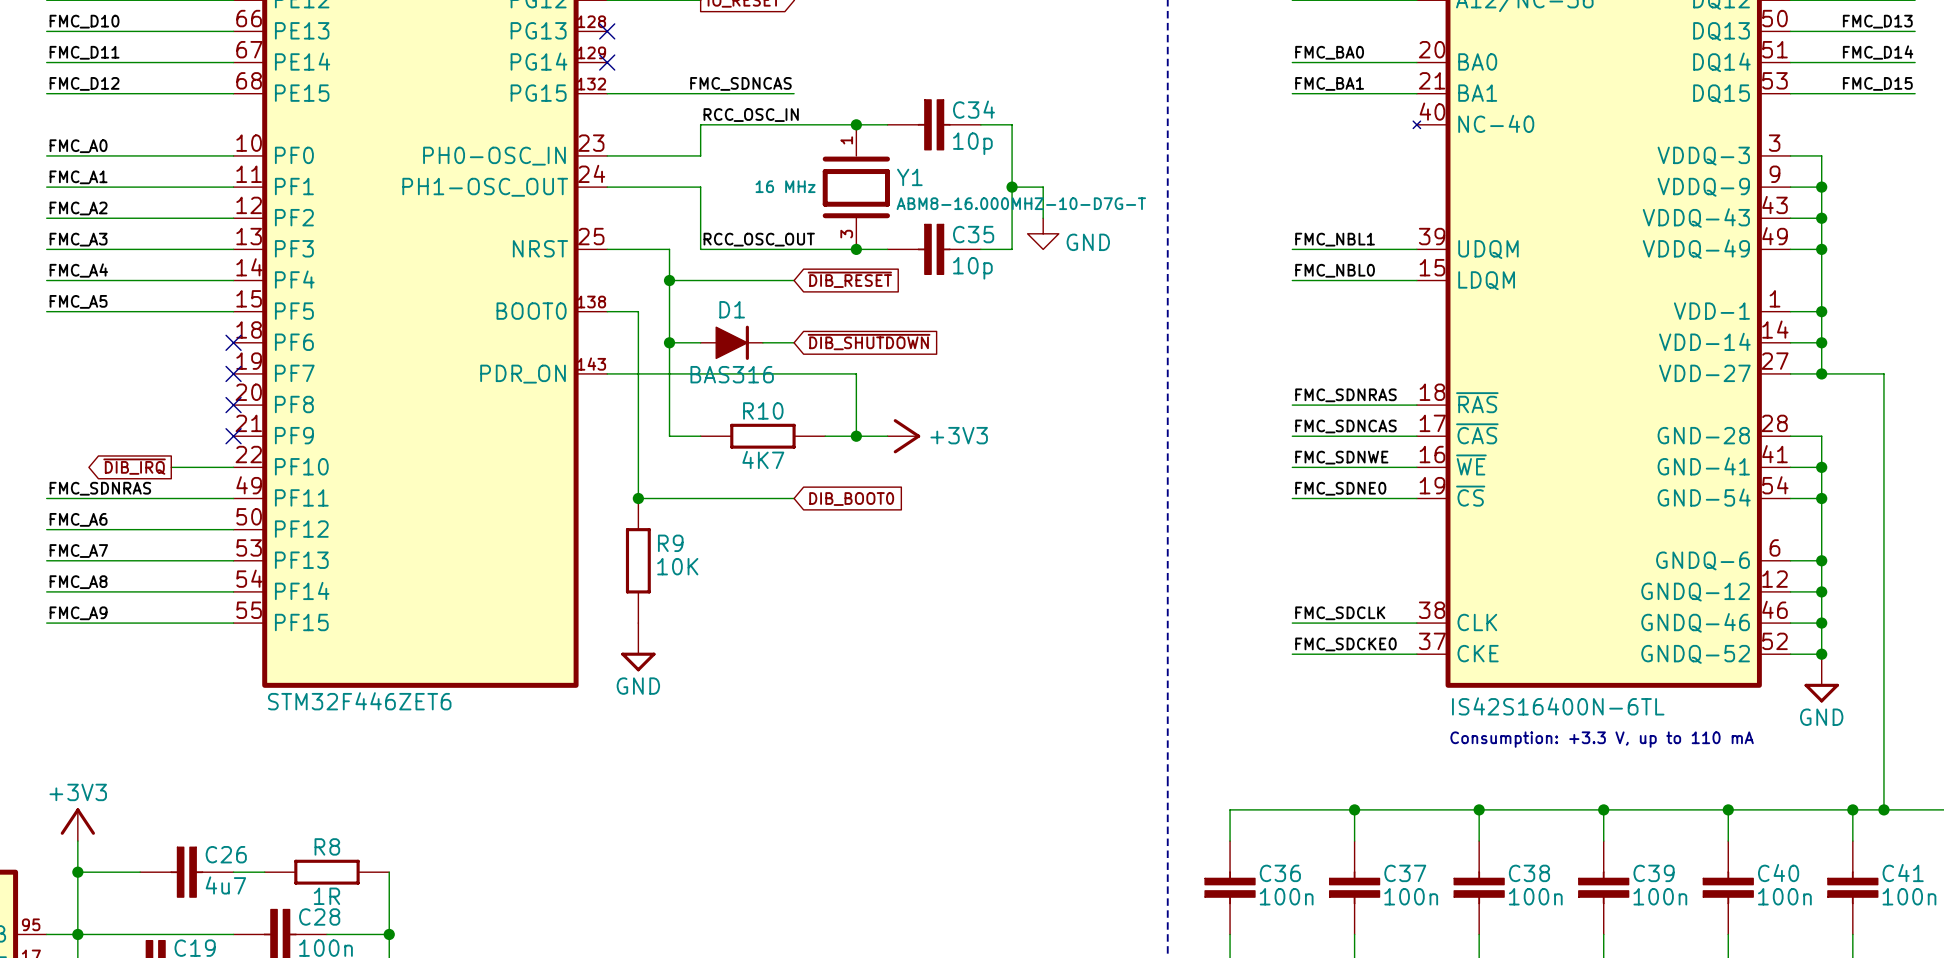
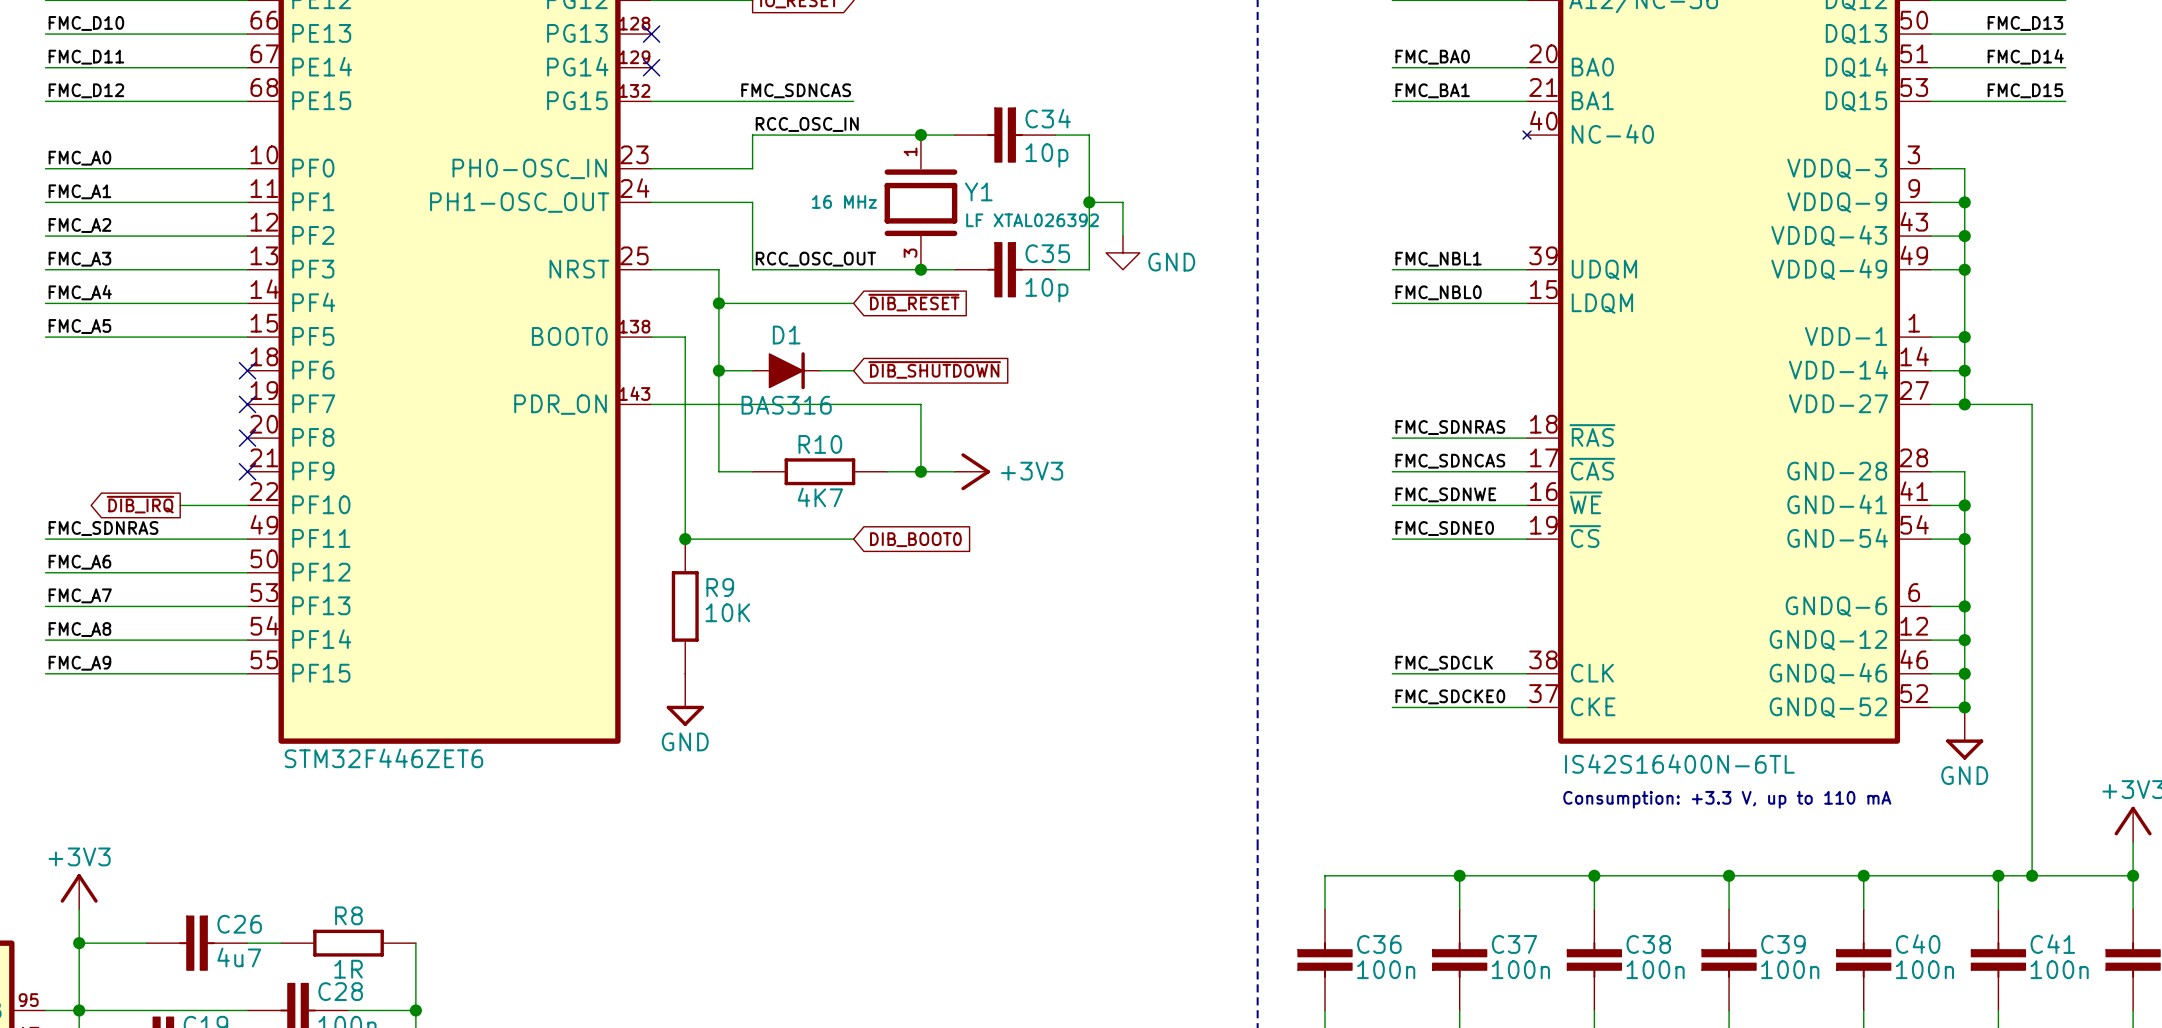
Y1 value: ABM8-16.000MHZ-10-D7G-T (1021, 203) -> LF XTAL026392 (1032, 220)

